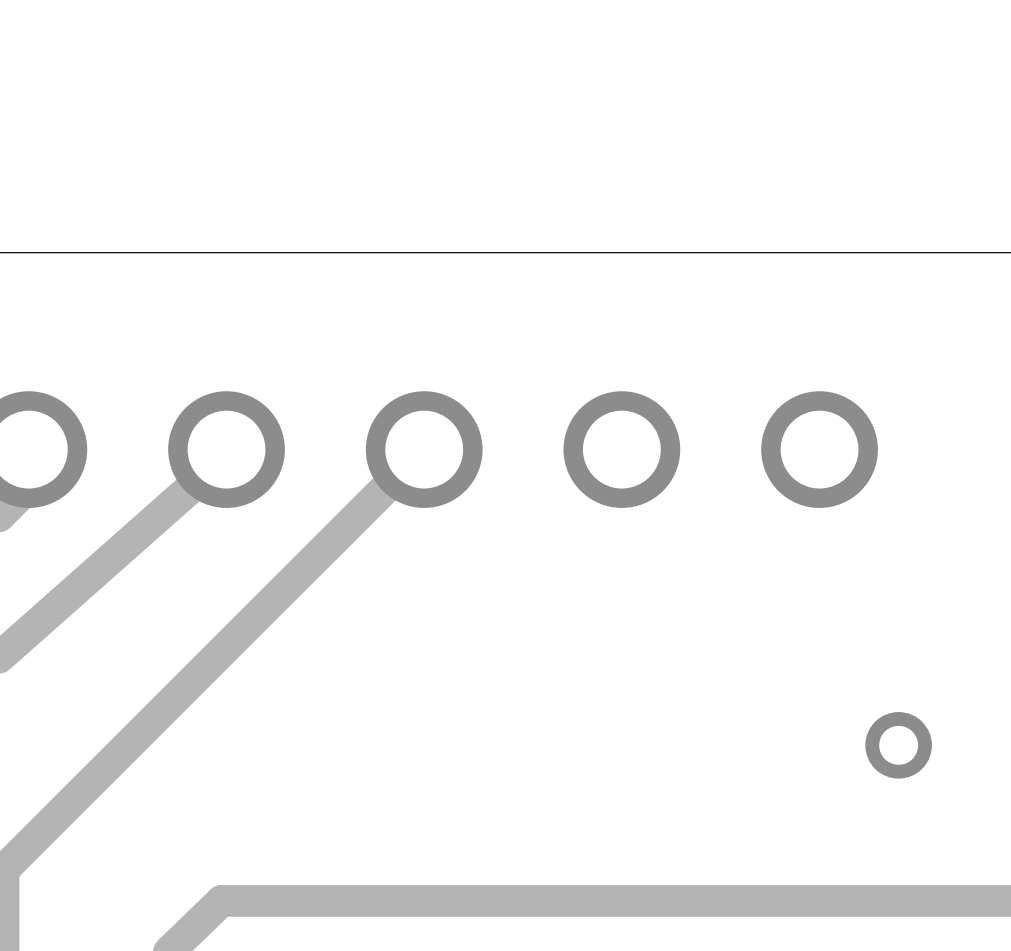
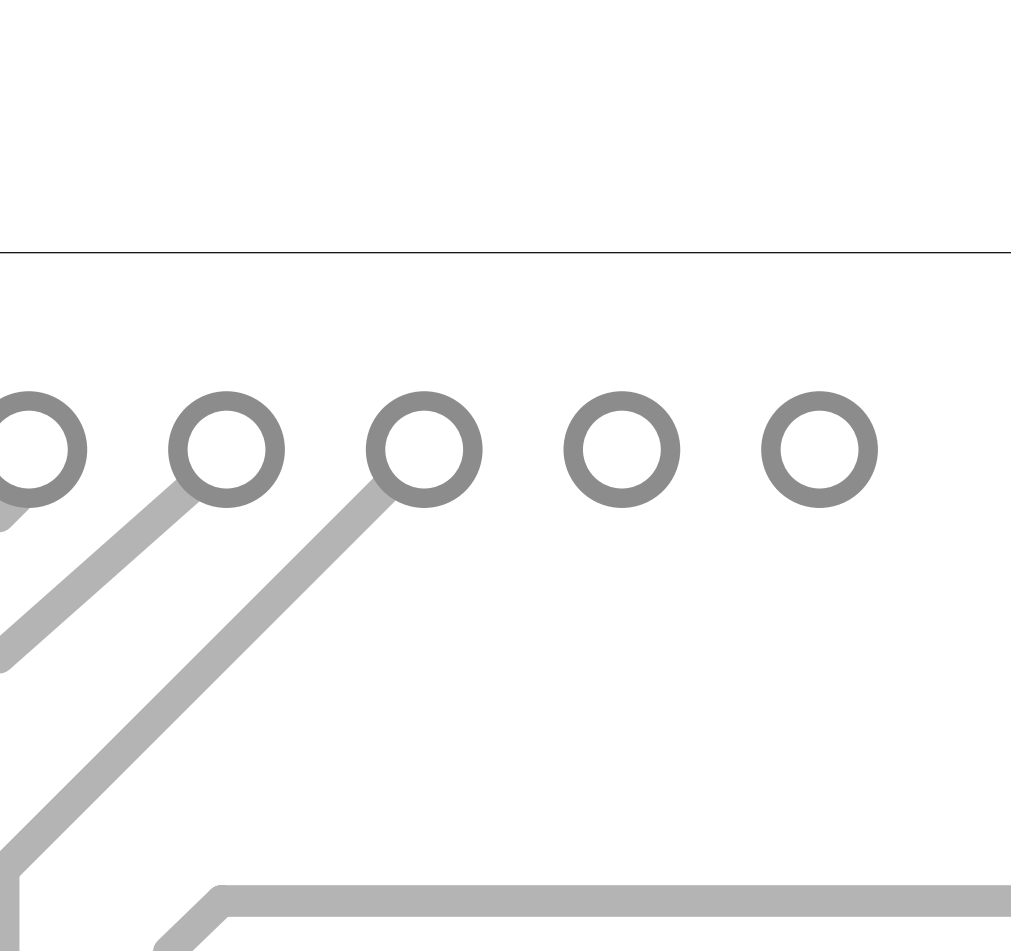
via: (898, 745) -> none

